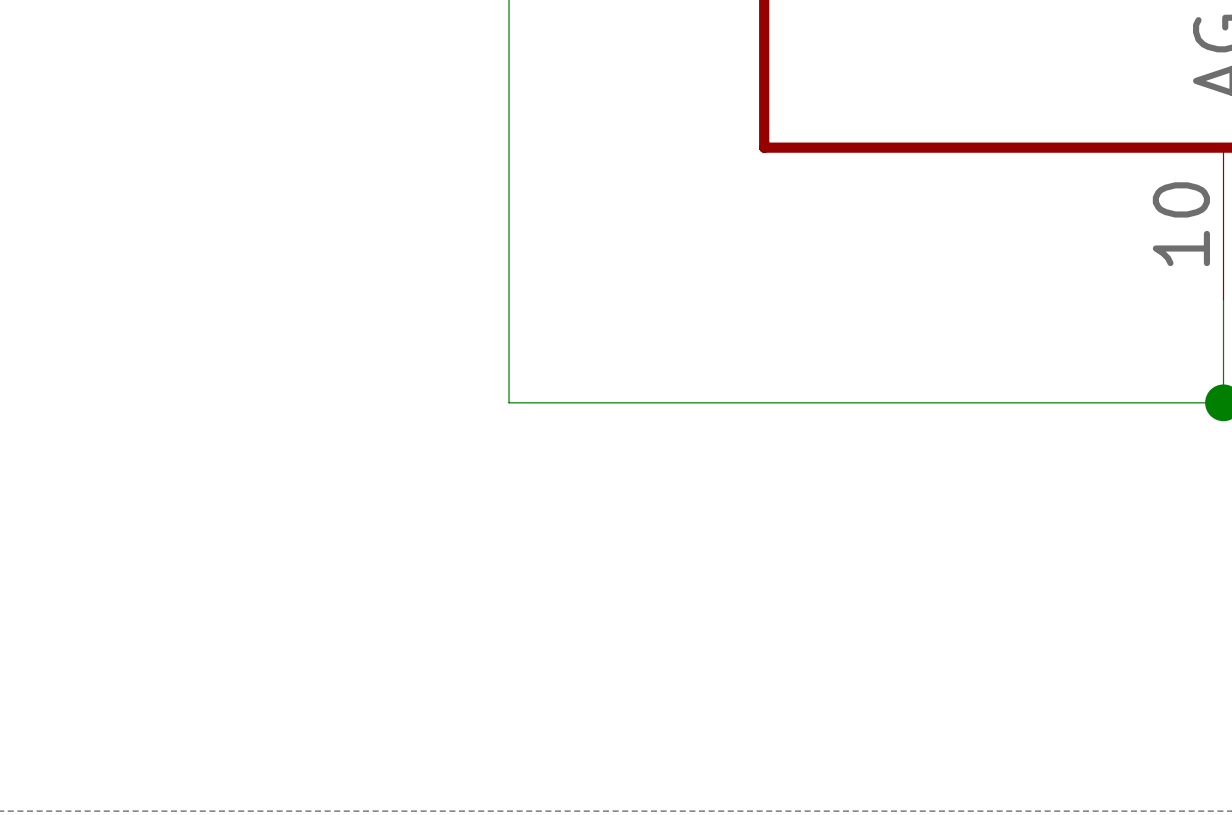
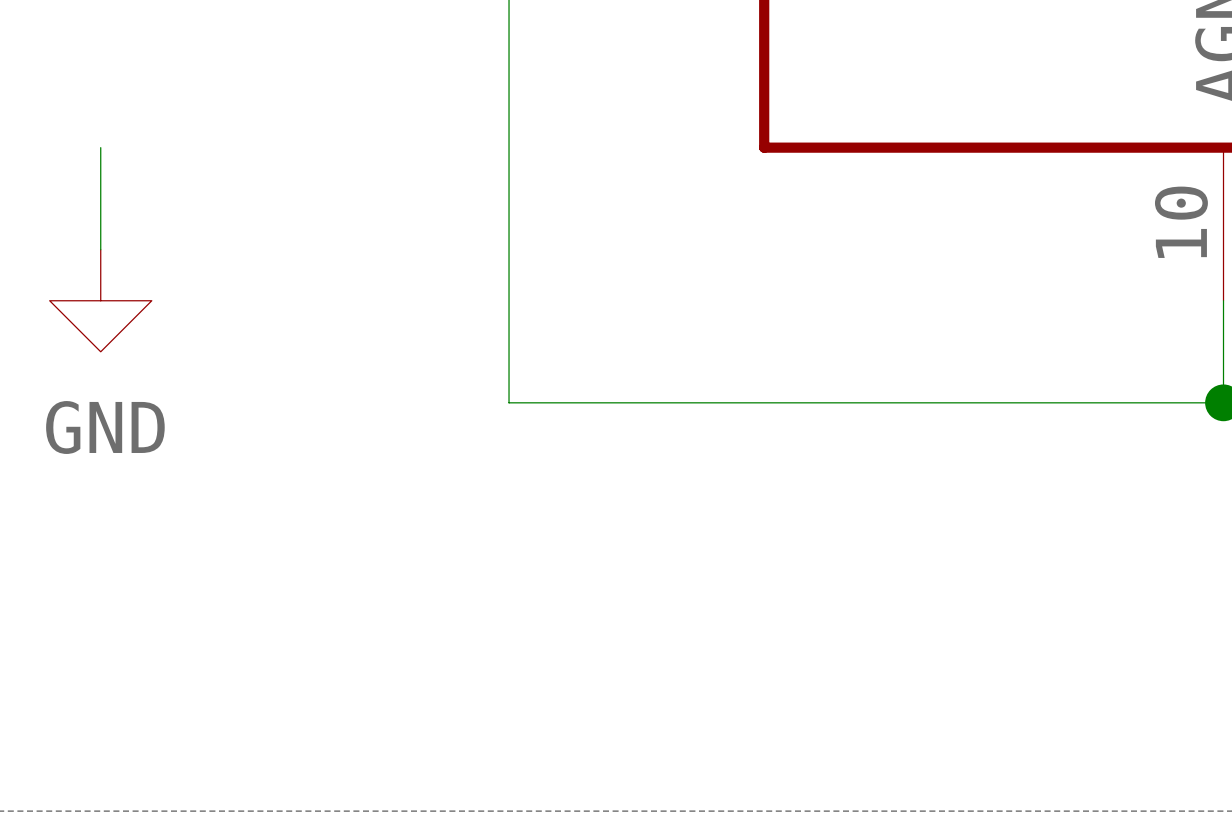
wire: none -> (100, 147) (100, 249)
power symbol: none -> GND (100, 300)

